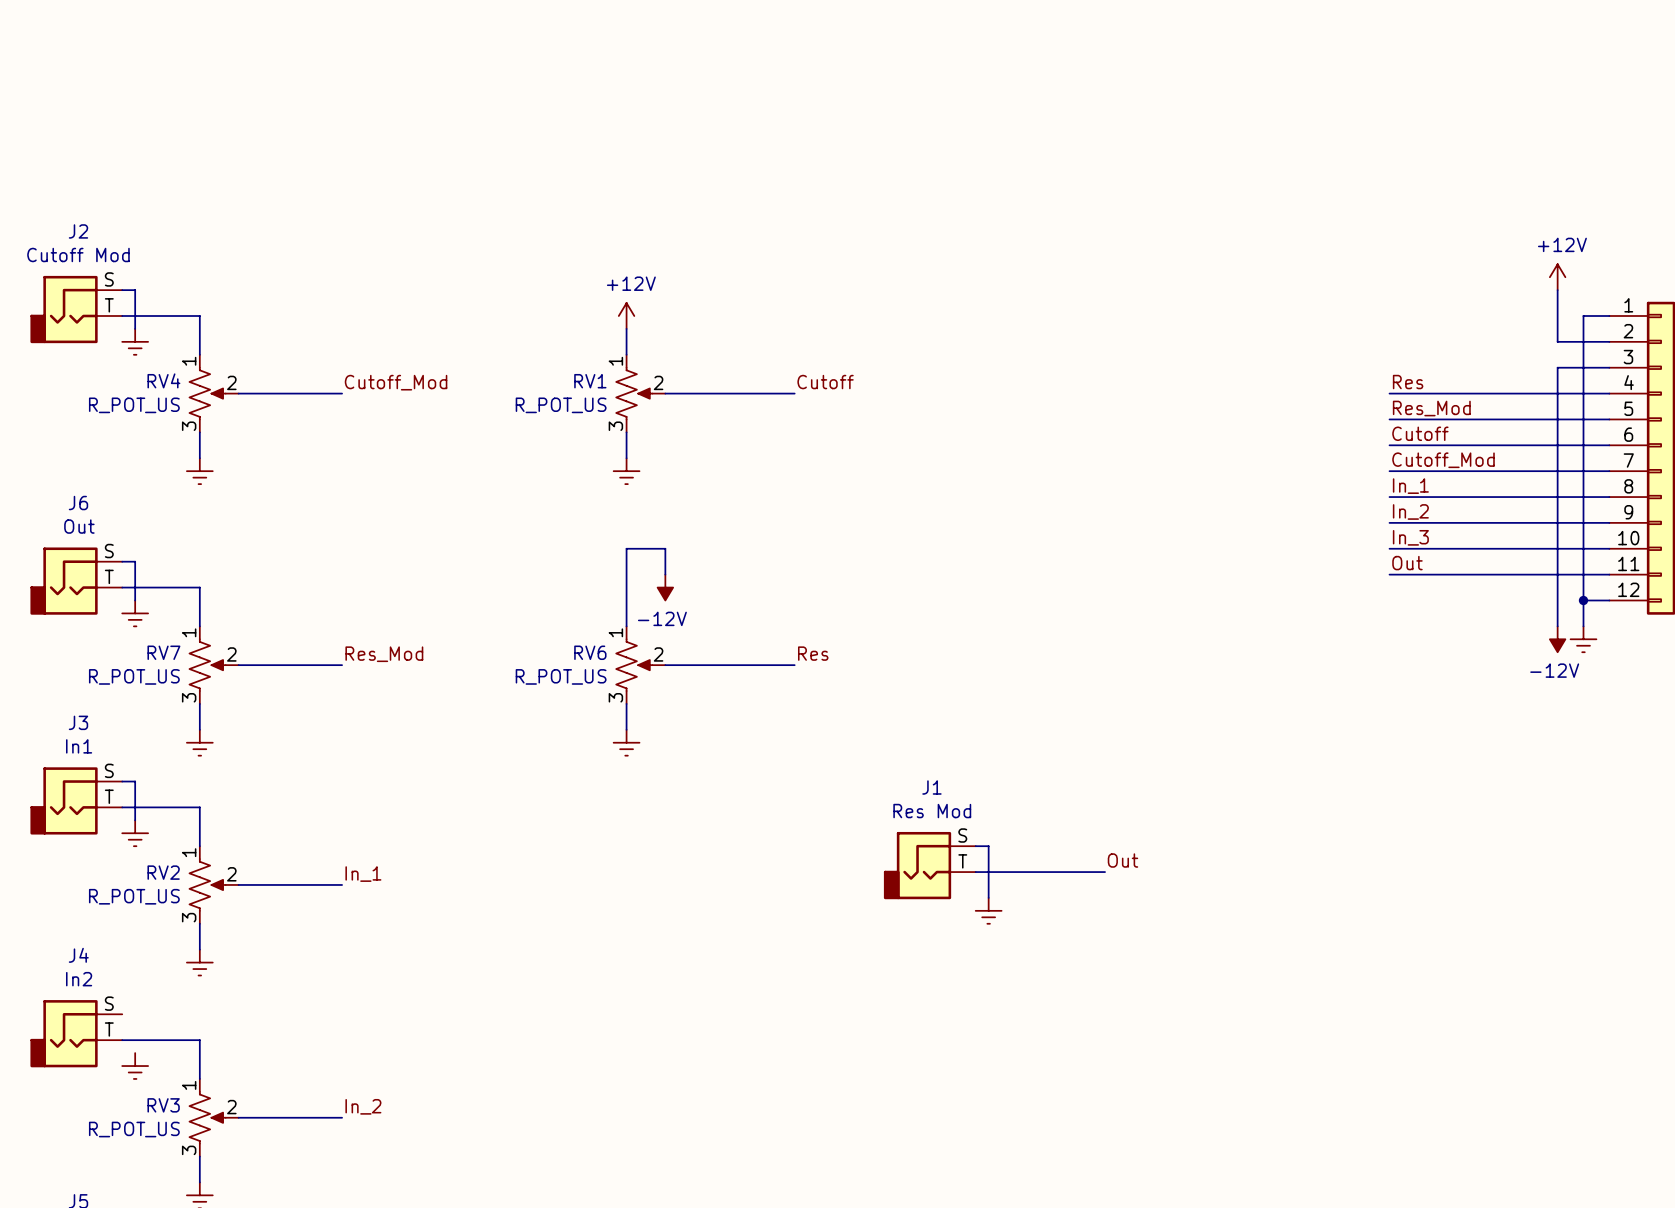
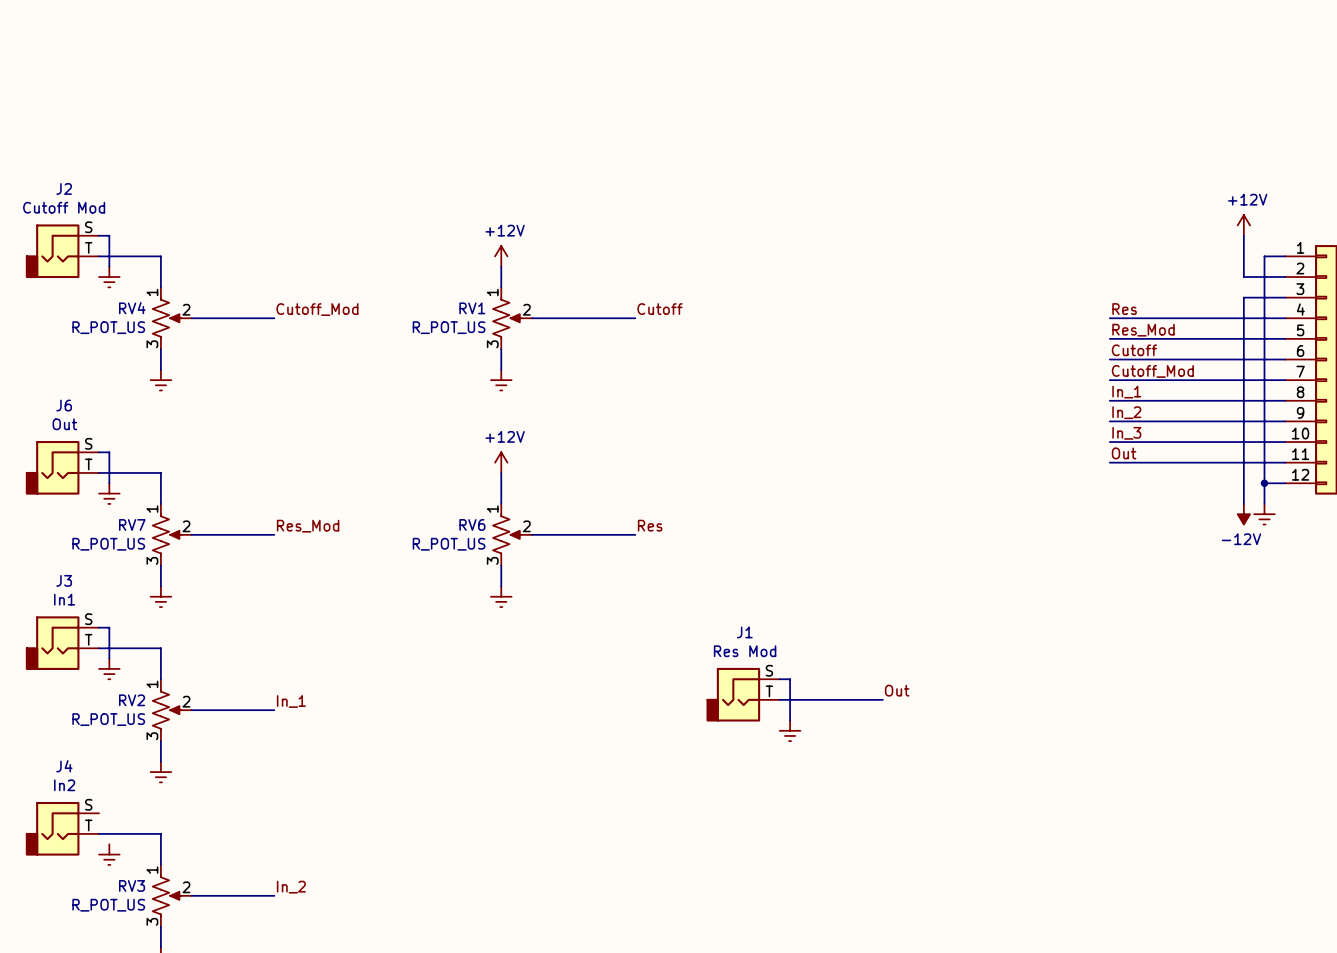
power symbol: none -> +12V (501, 462)
wire: (665, 574) (665, 548) (626, 548) (626, 587) -> none
power symbol: -12V (665, 587) -> none

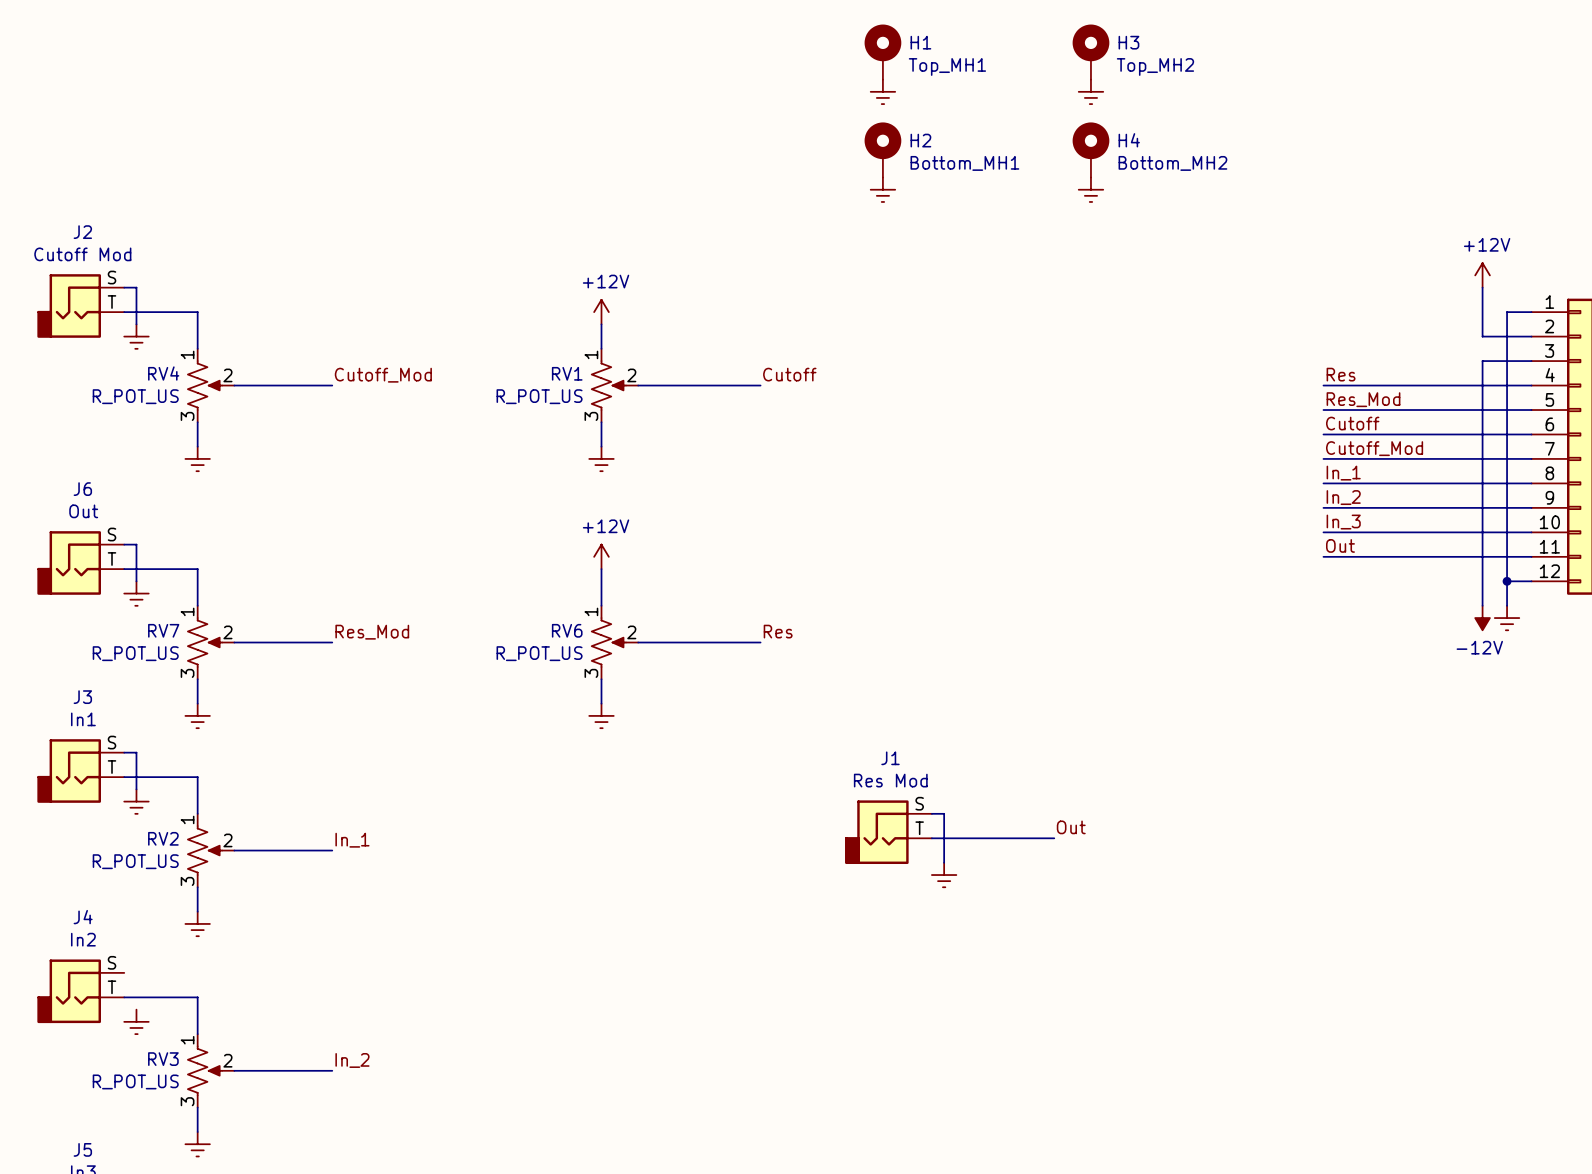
H1: none -> Top_MH1 (882, 52)
H3: none -> Top_MH2 (1090, 52)
power symbol: none -> (882, 91)
power symbol: none -> (1090, 91)
H2: none -> Bottom_MH1 (882, 149)
H4: none -> Bottom_MH2 (1090, 149)
power symbol: none -> (882, 189)
power symbol: none -> (1090, 189)

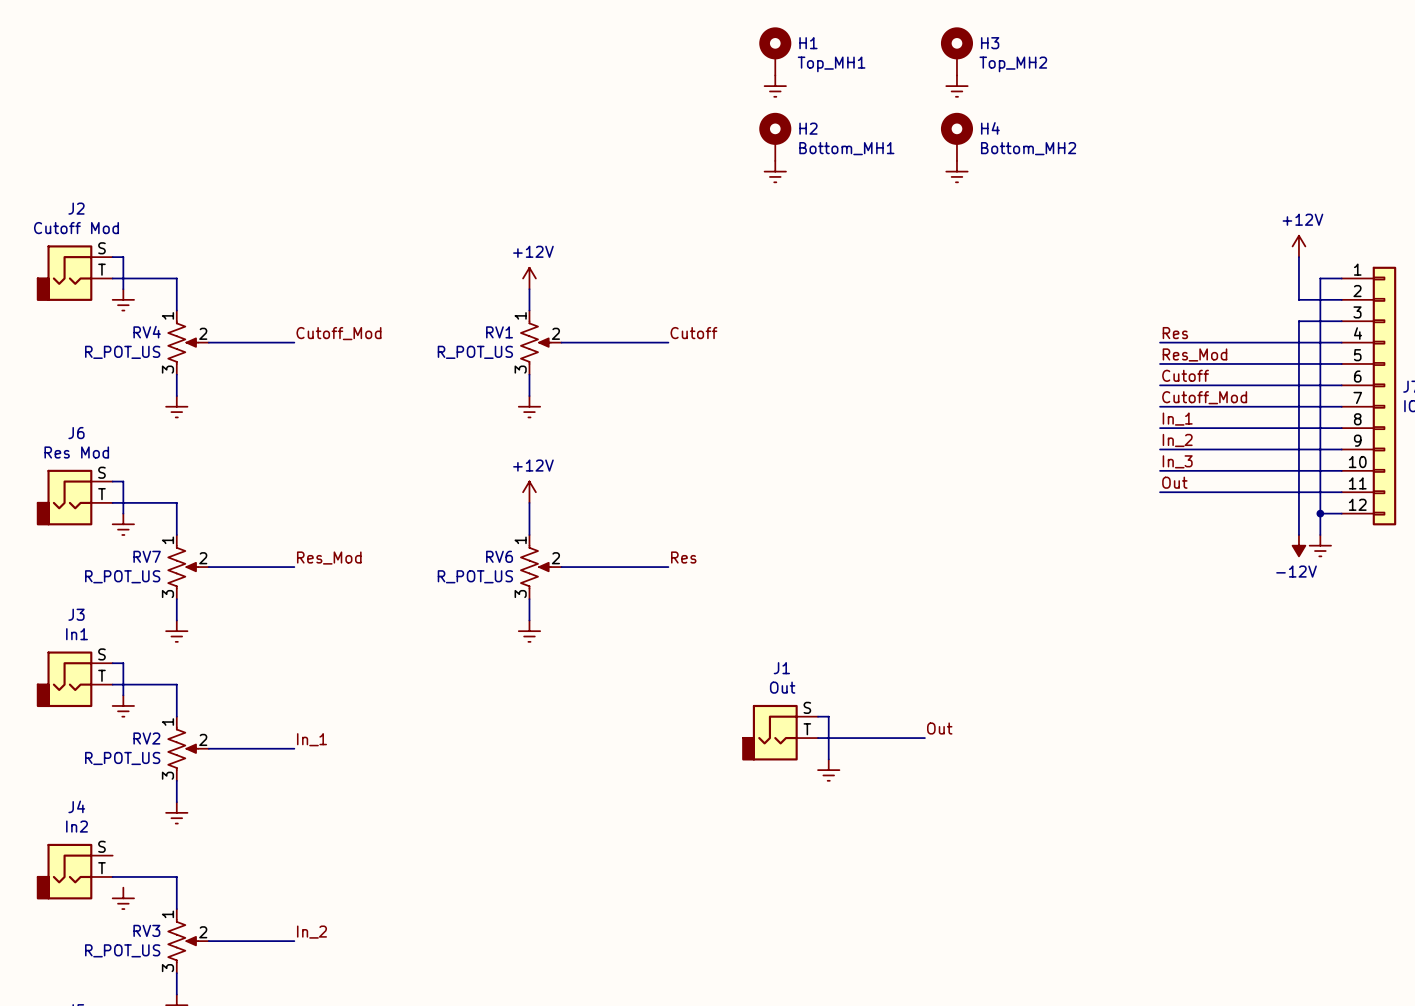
J6 value: Out (83, 511) -> Res Mod (76, 452)
J1 value: Res Mod (890, 780) -> Out (782, 687)

